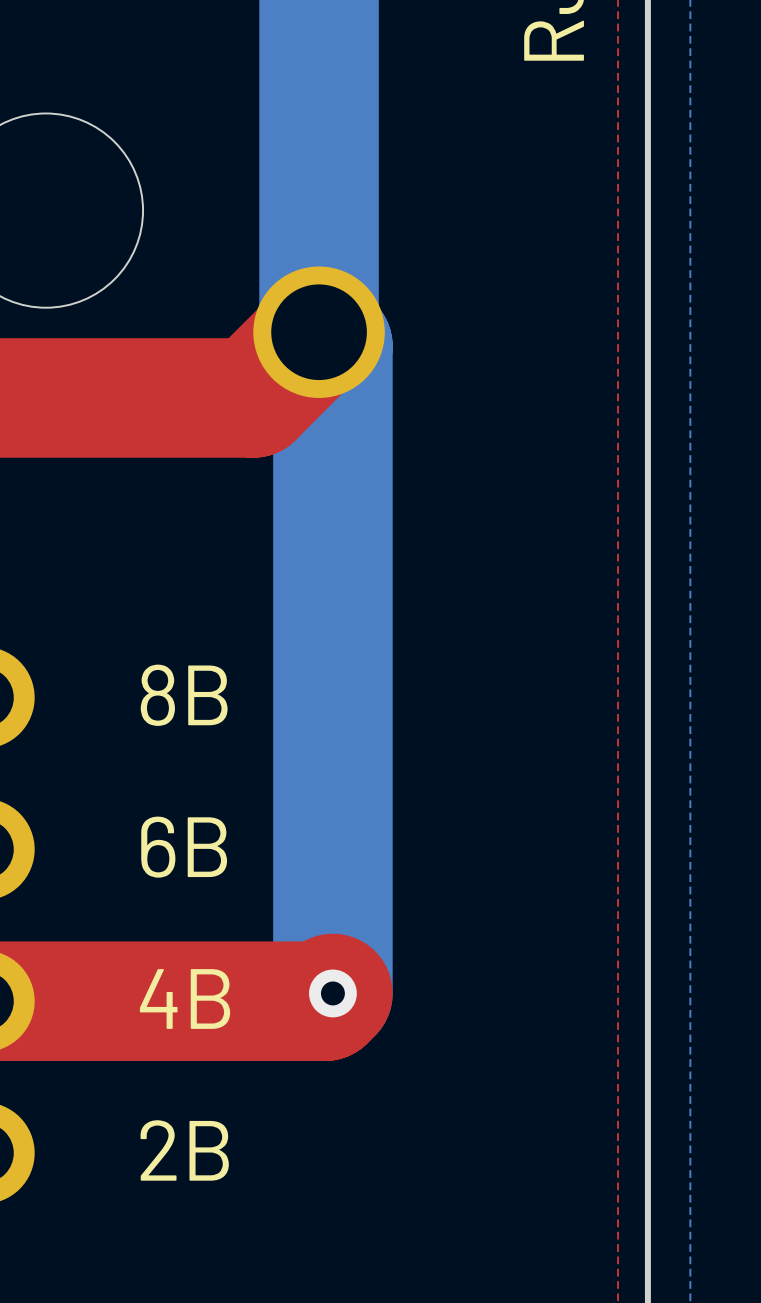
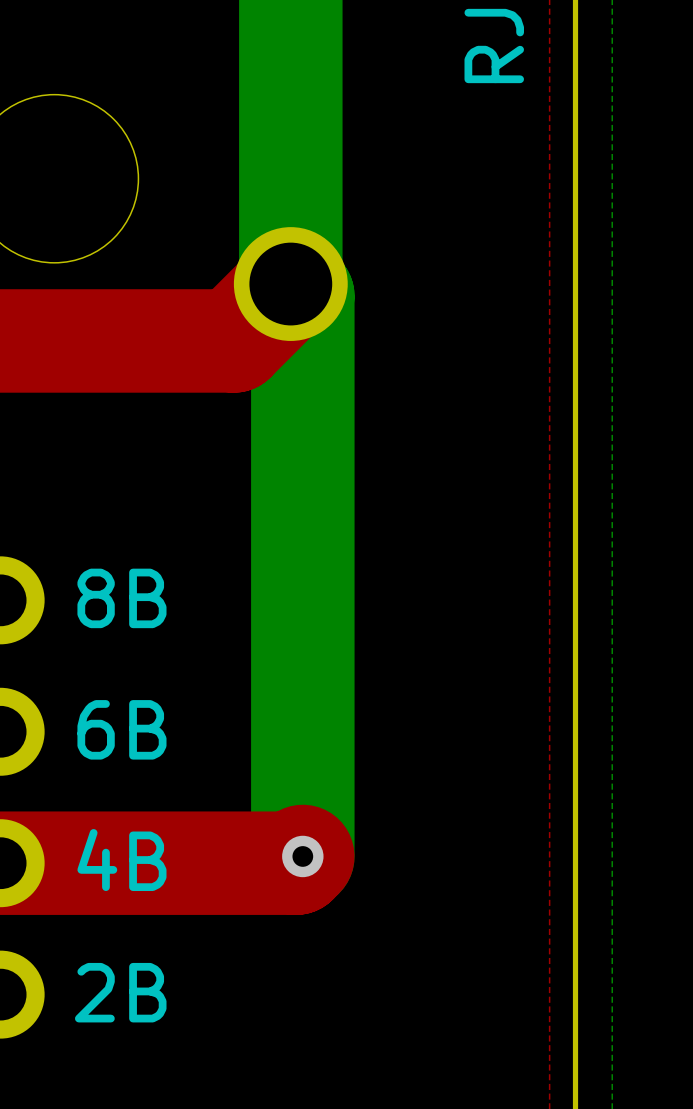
text position: 8B (184, 695) -> 8B (121, 598)
text position: 6B (184, 847) -> 6B (121, 729)
text position: 4B (185, 998) -> 4B (121, 860)
text position: 2B (184, 1150) -> 2B (120, 992)

